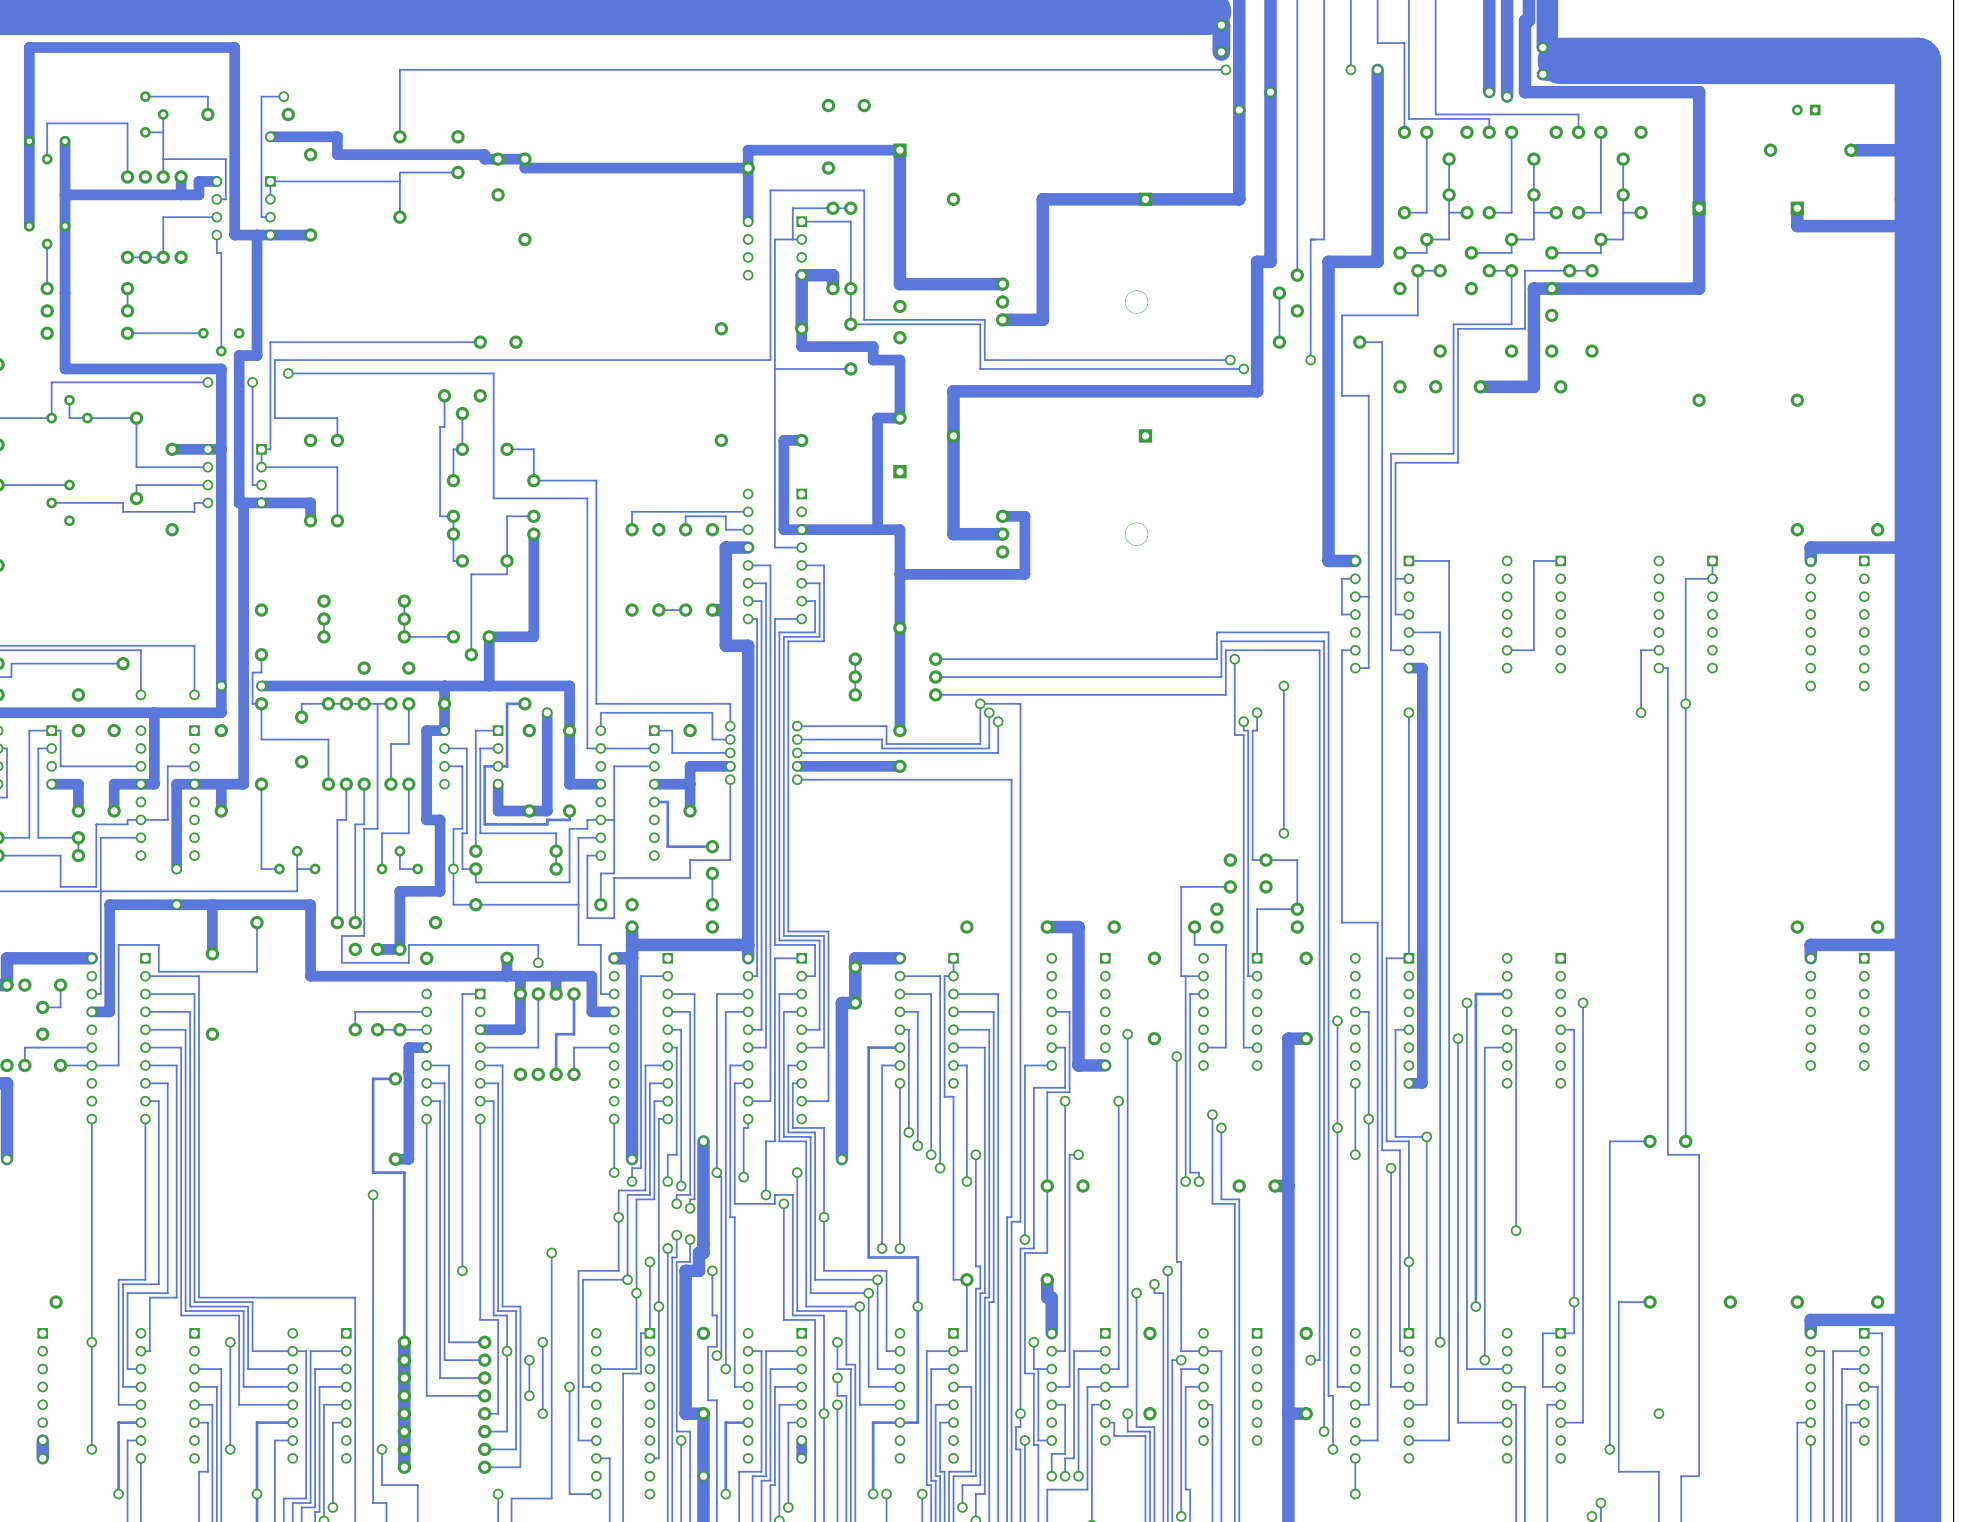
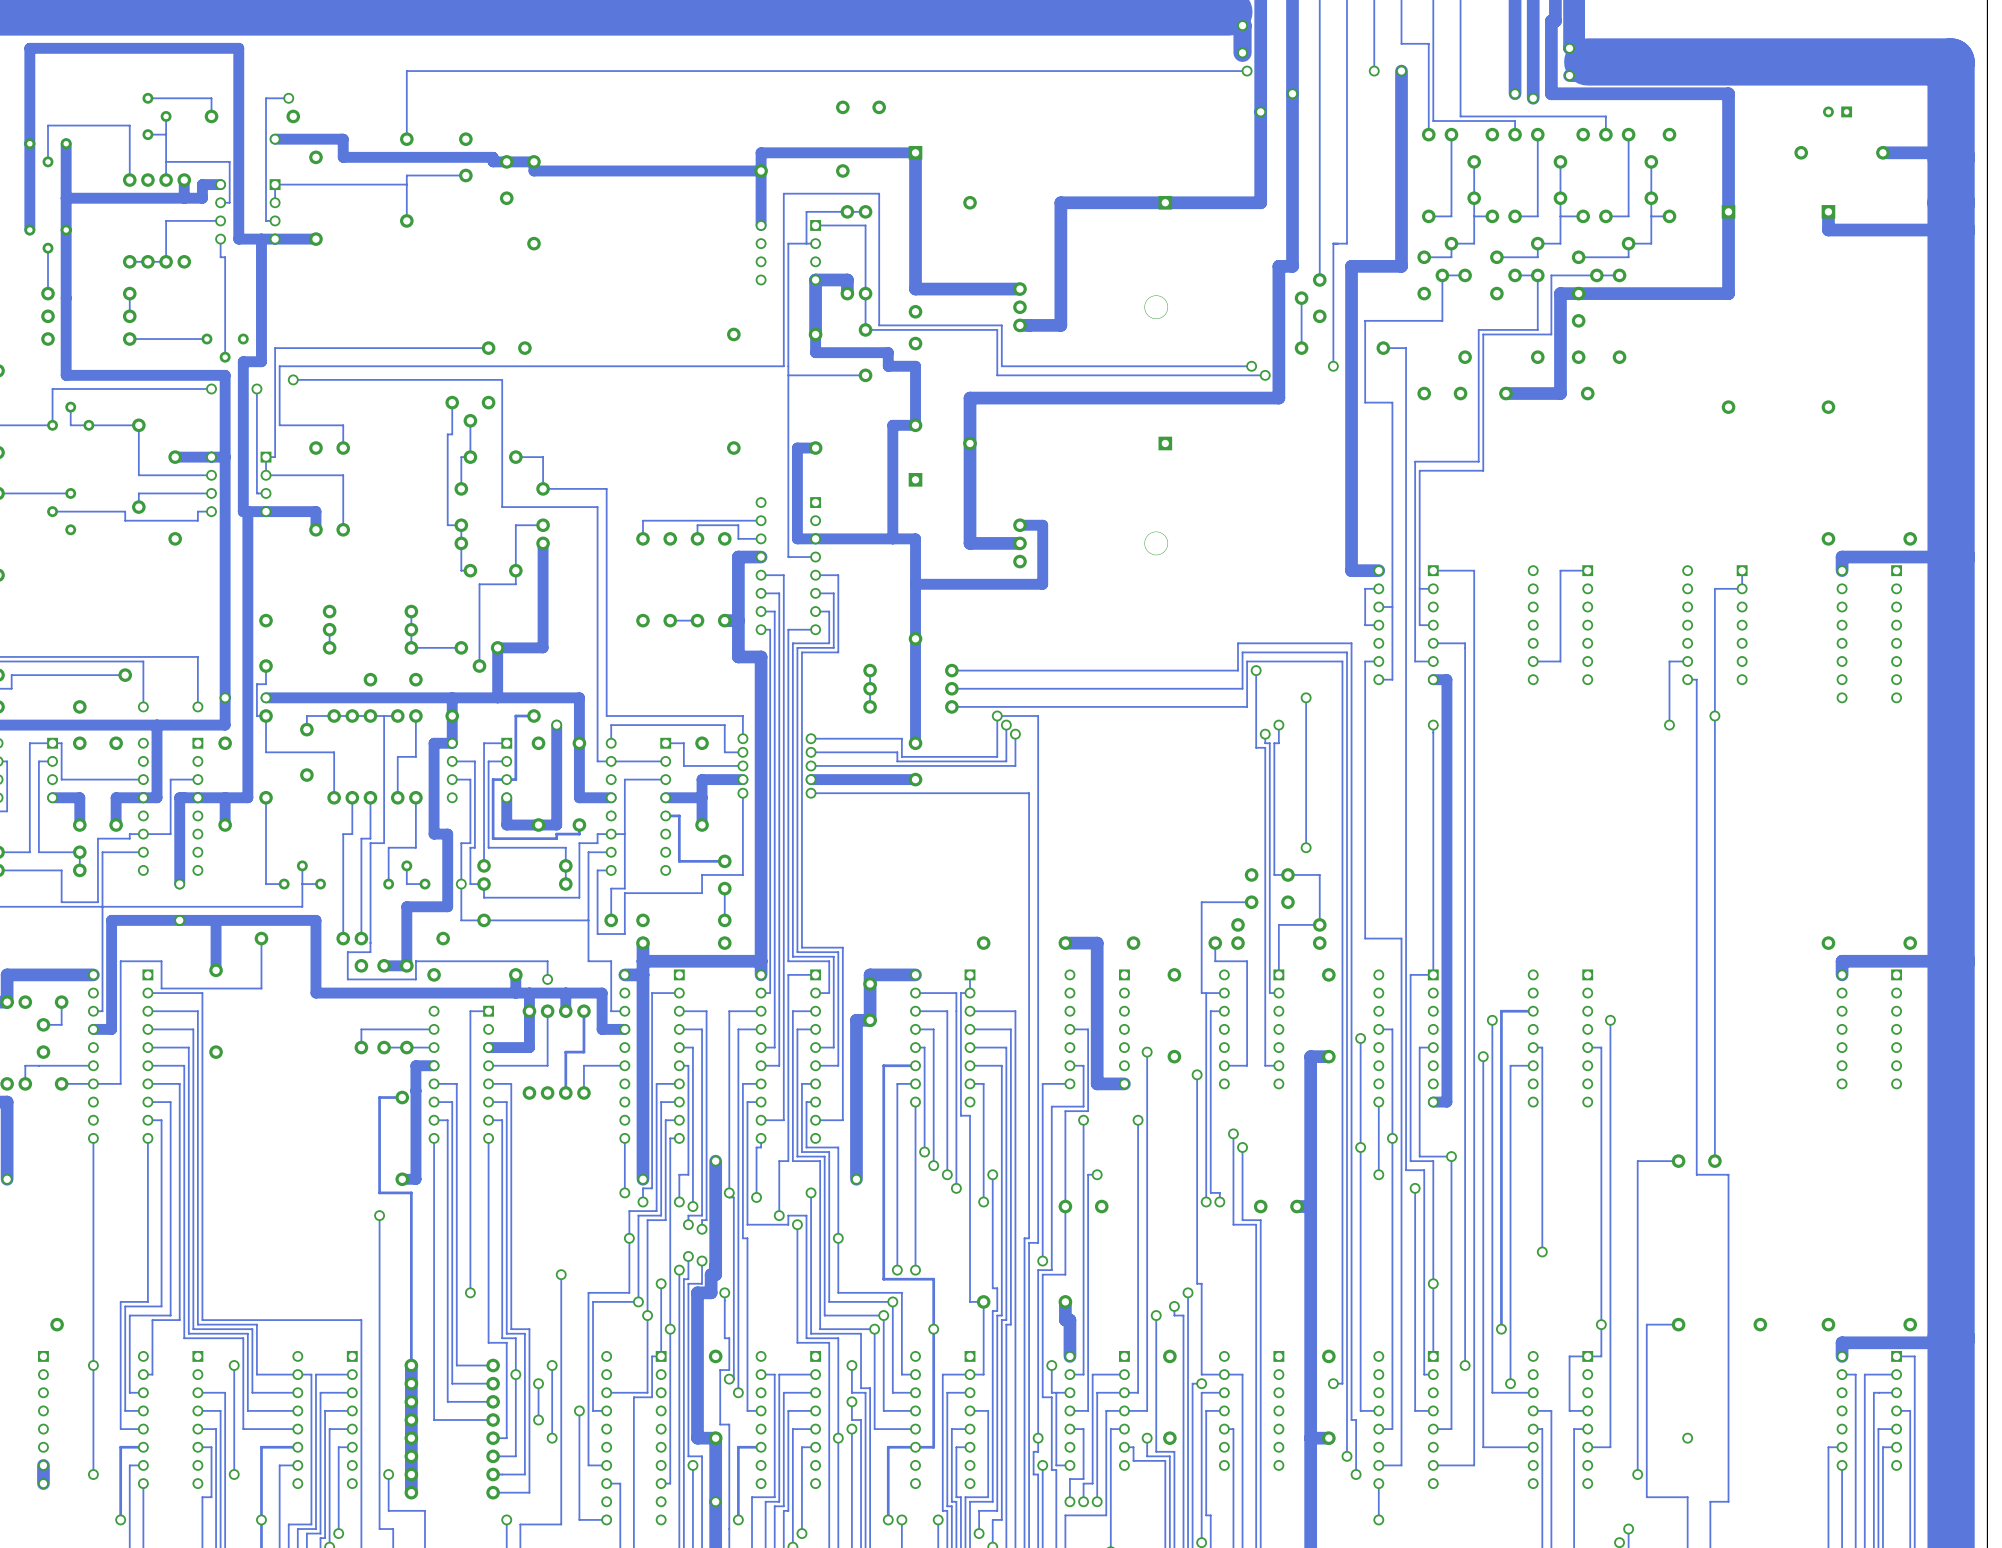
track: (801, 1440) (801, 1458) -> none

